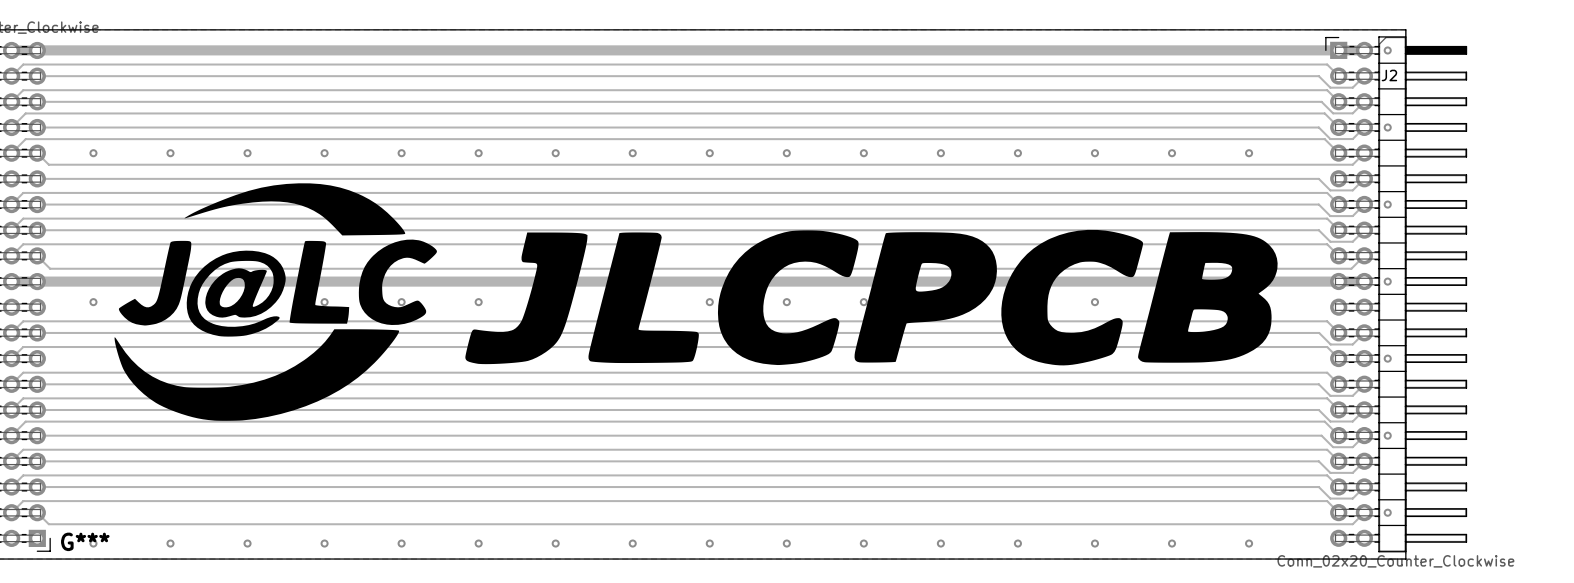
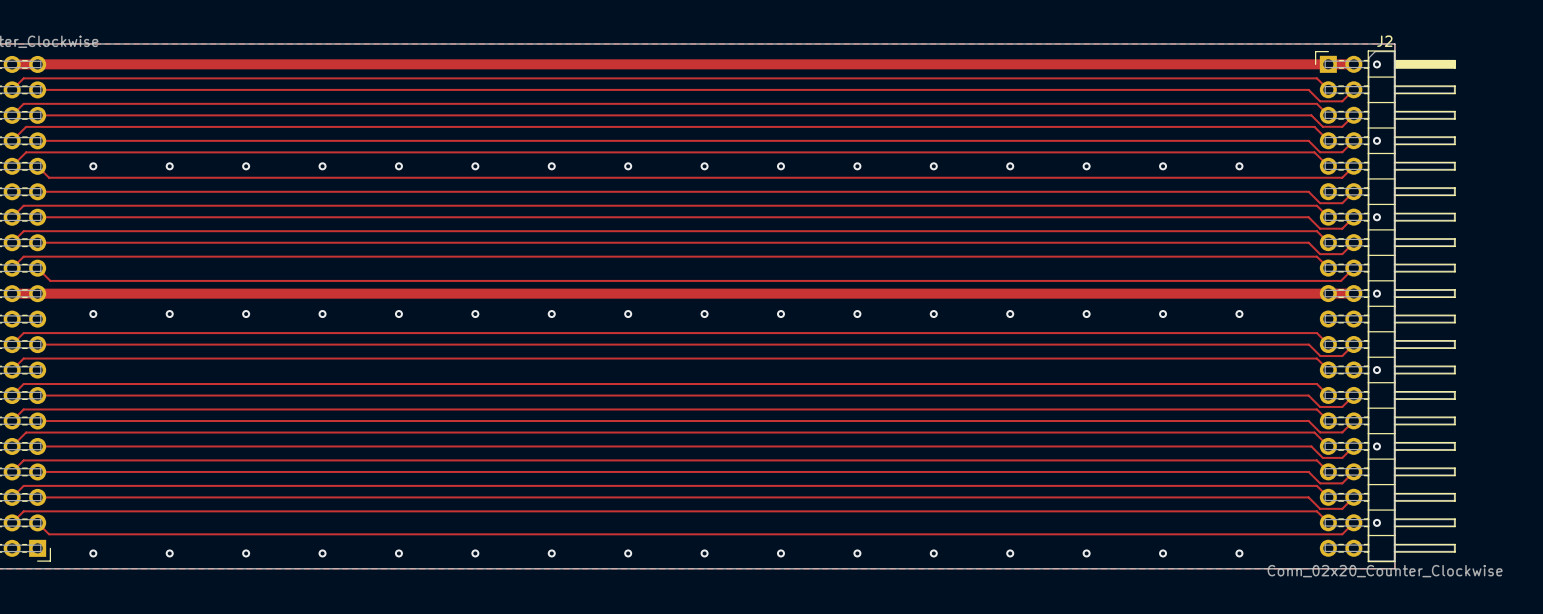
J2 name position: J2 (1389, 75) -> J2 (1384, 41)
G***: (696, 302) -> none

